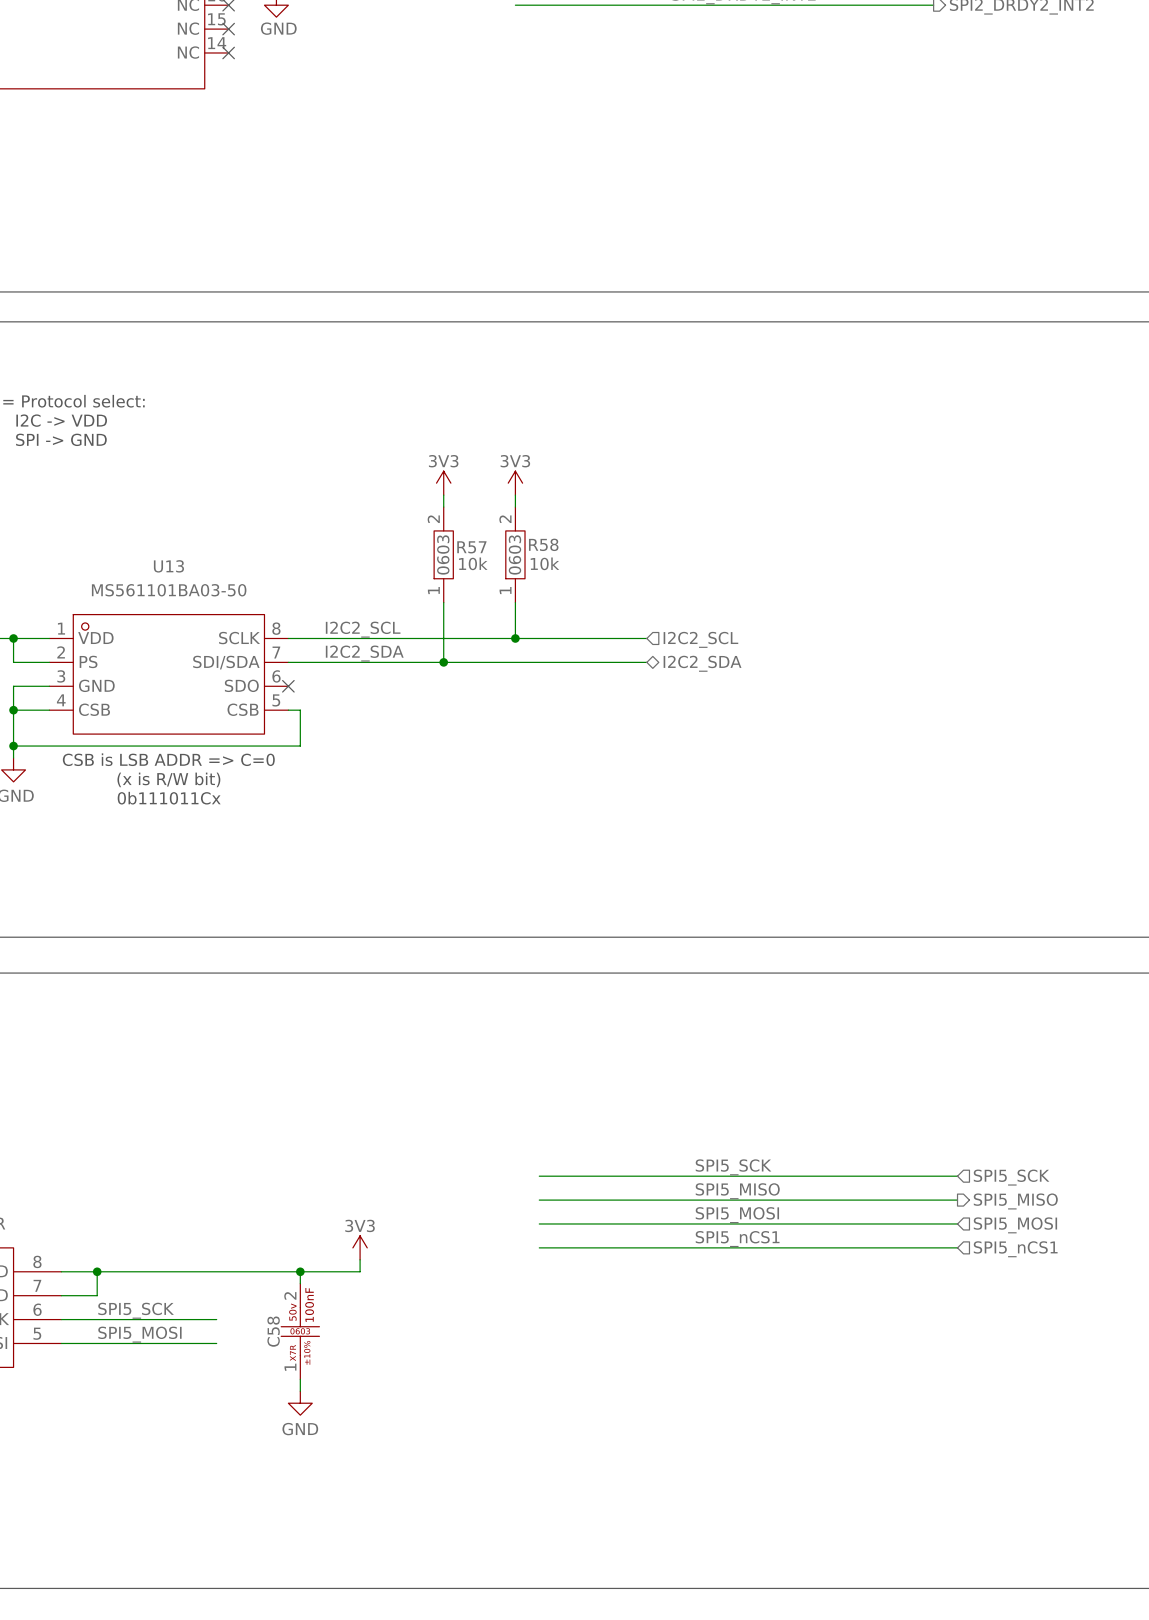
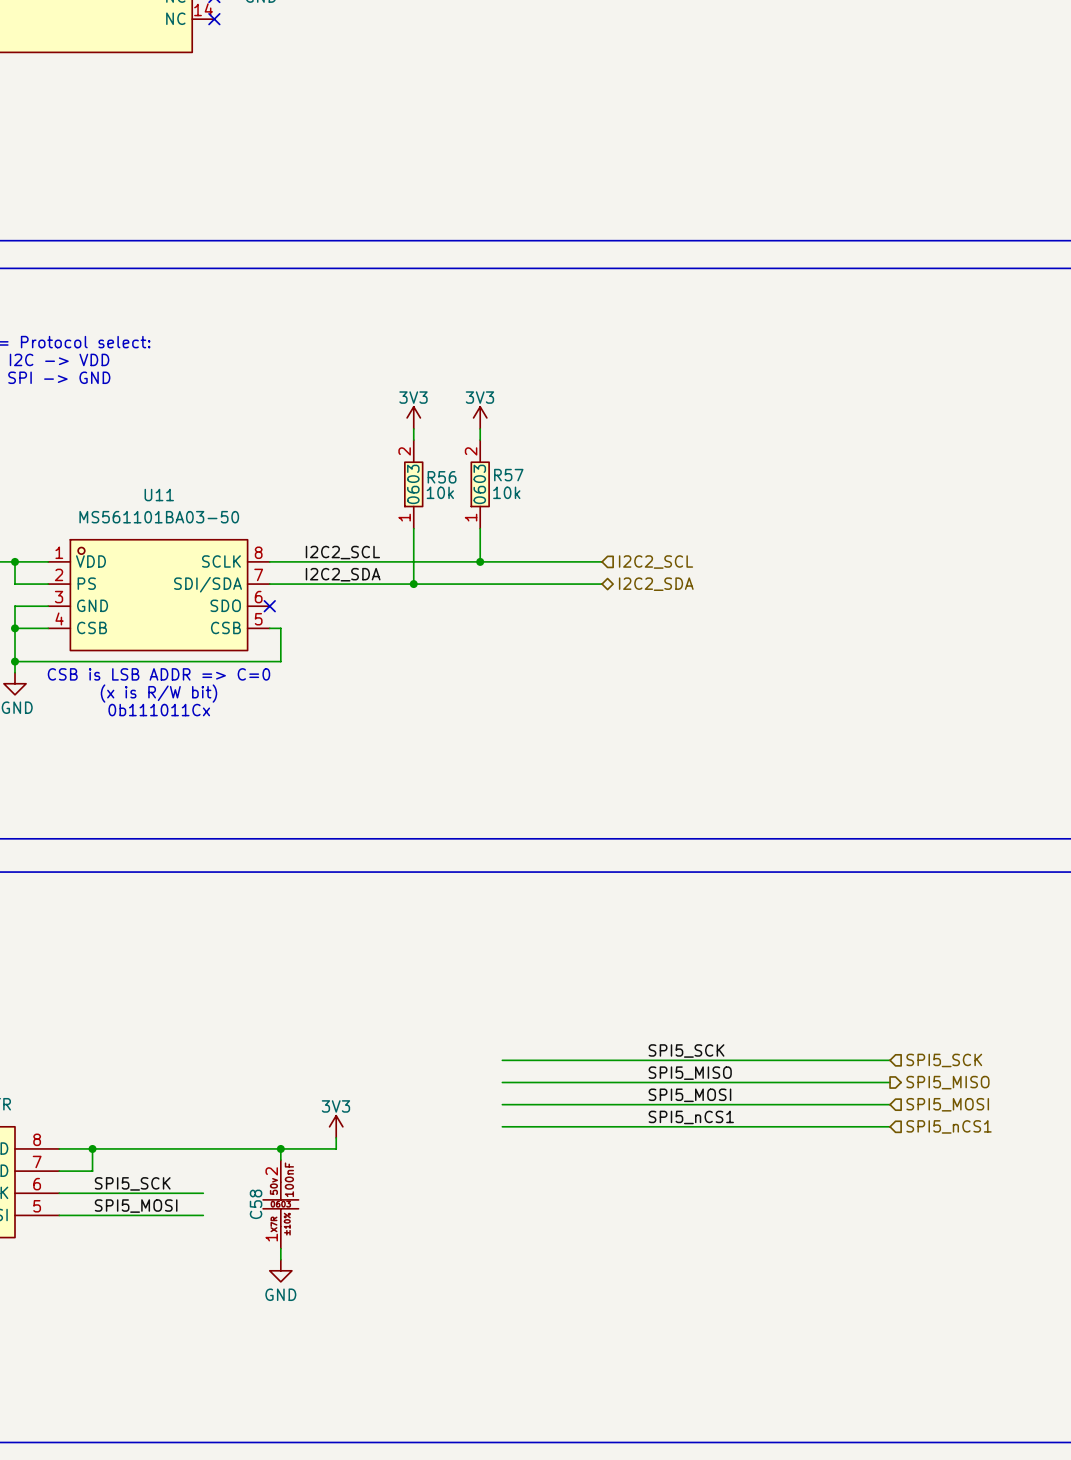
R58 name: R58 (543, 544) -> R57 (508, 475)
R57 name: R57 (471, 547) -> R56 (442, 477)
U13 name: U13 (168, 566) -> U11 (159, 495)

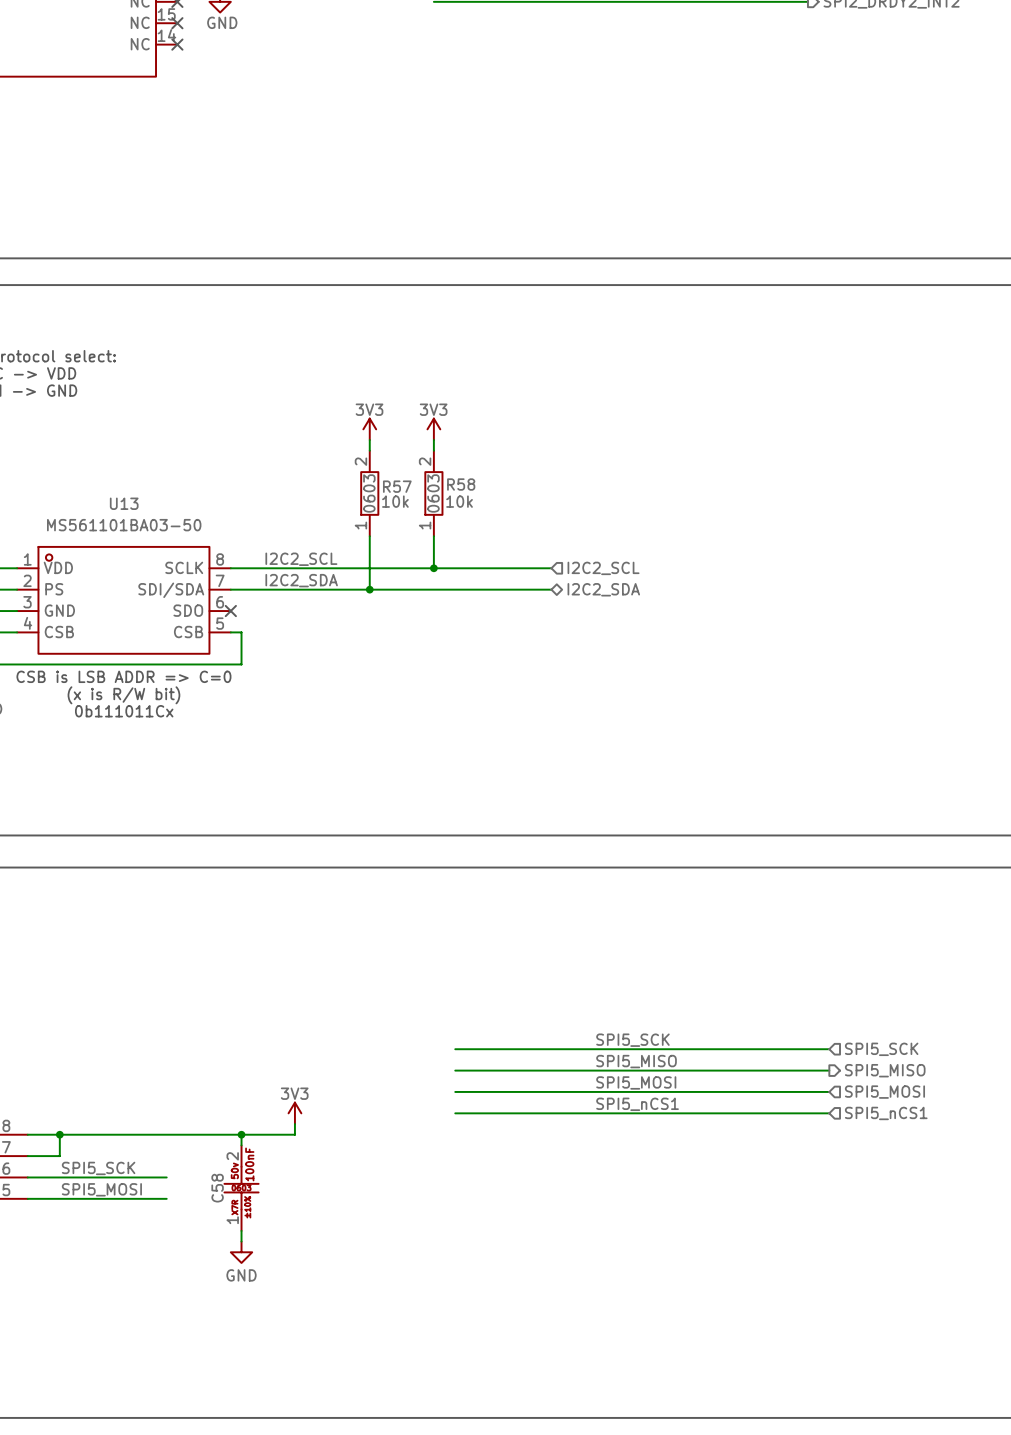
R57 name: R57 (508, 475) -> R58 (461, 484)
R56 name: R56 (442, 477) -> R57 (397, 486)
U11 name: U11 (159, 495) -> U13 (124, 503)

